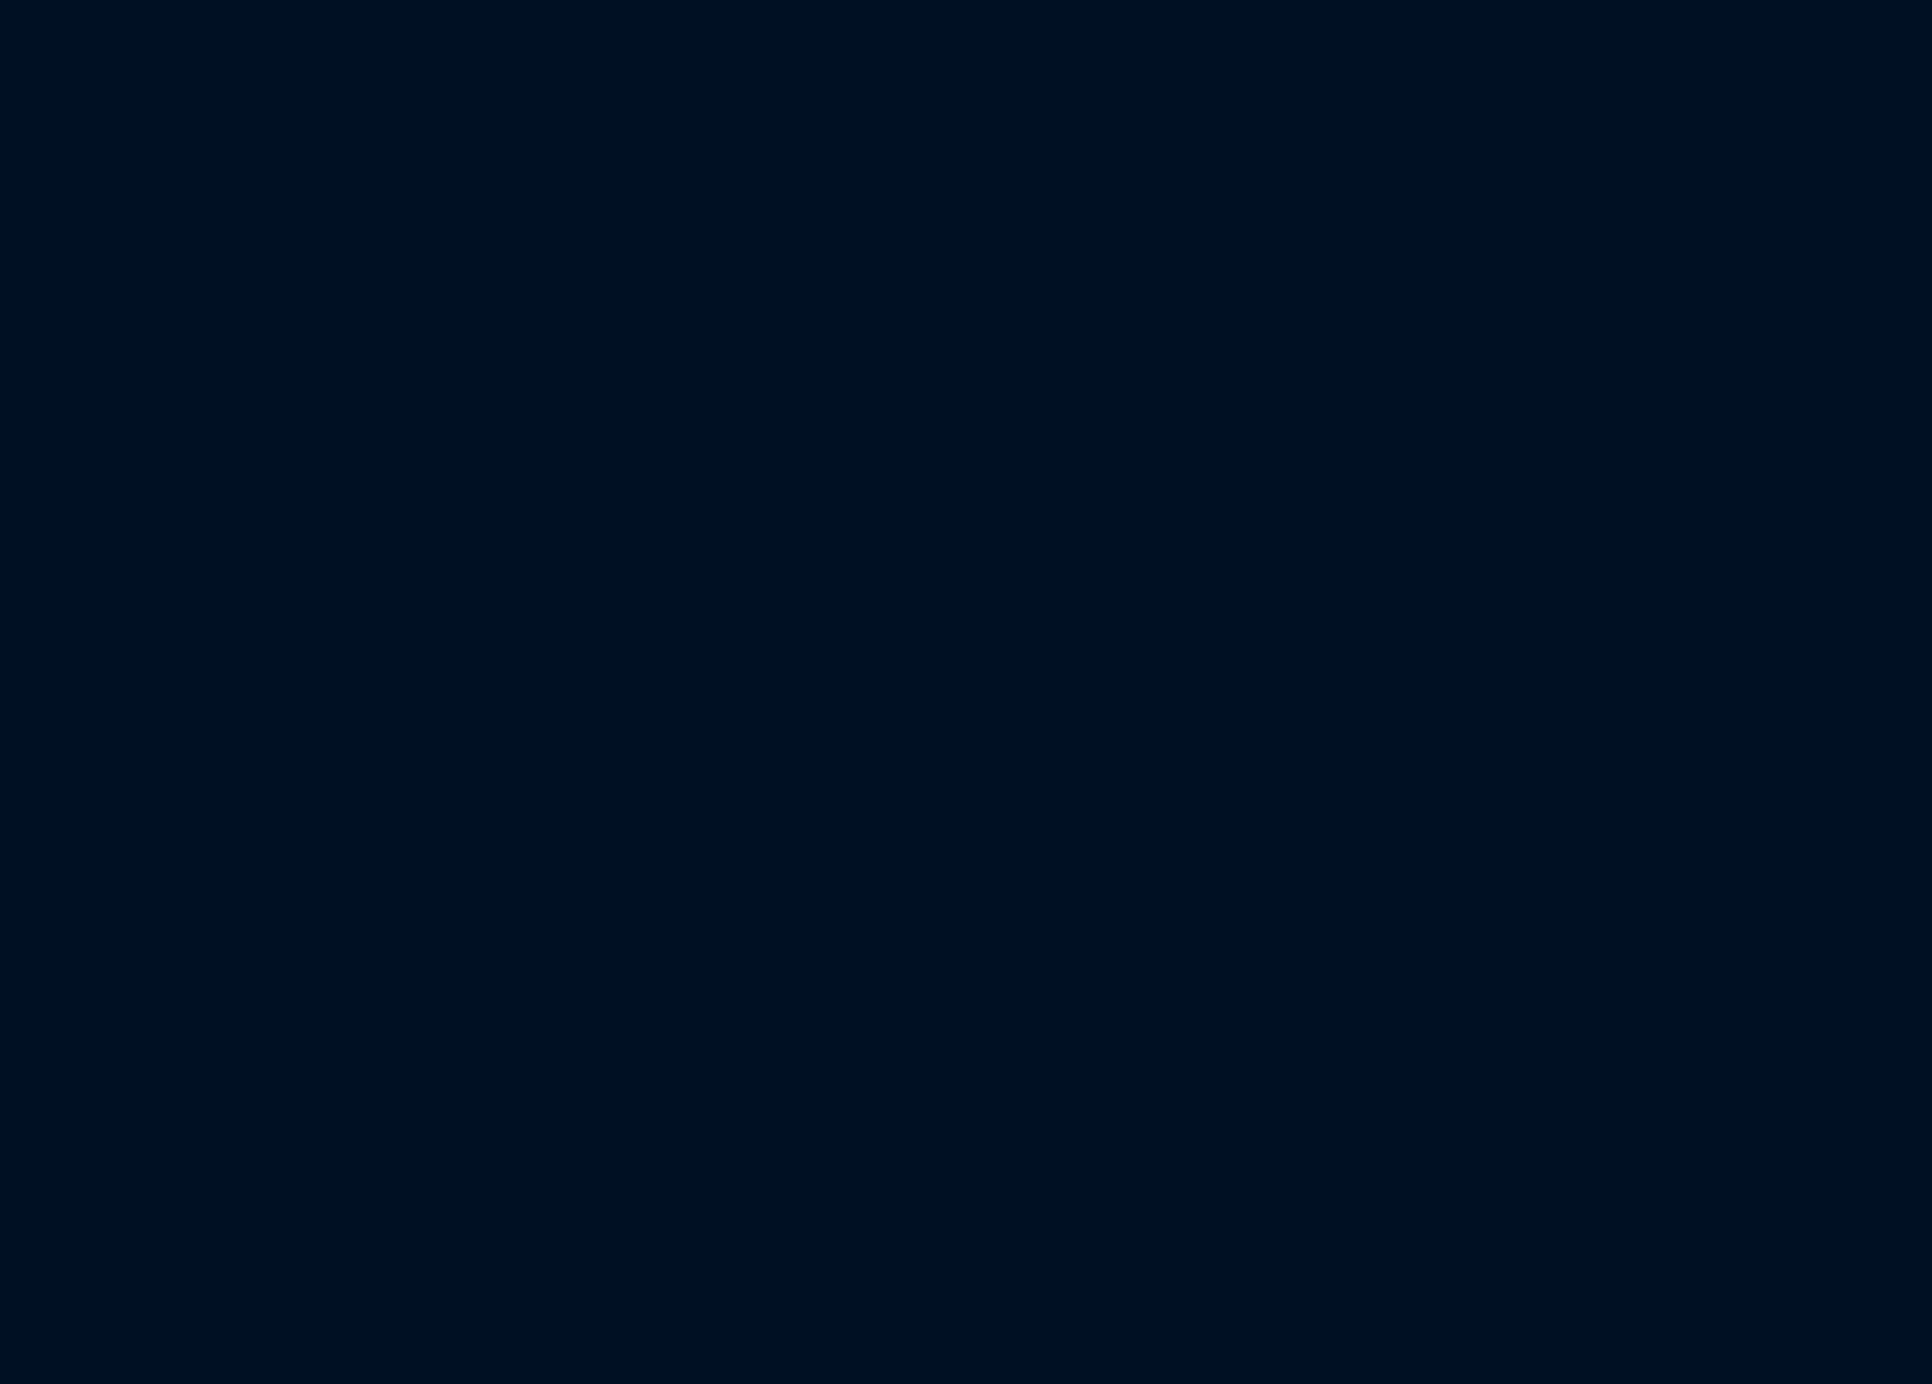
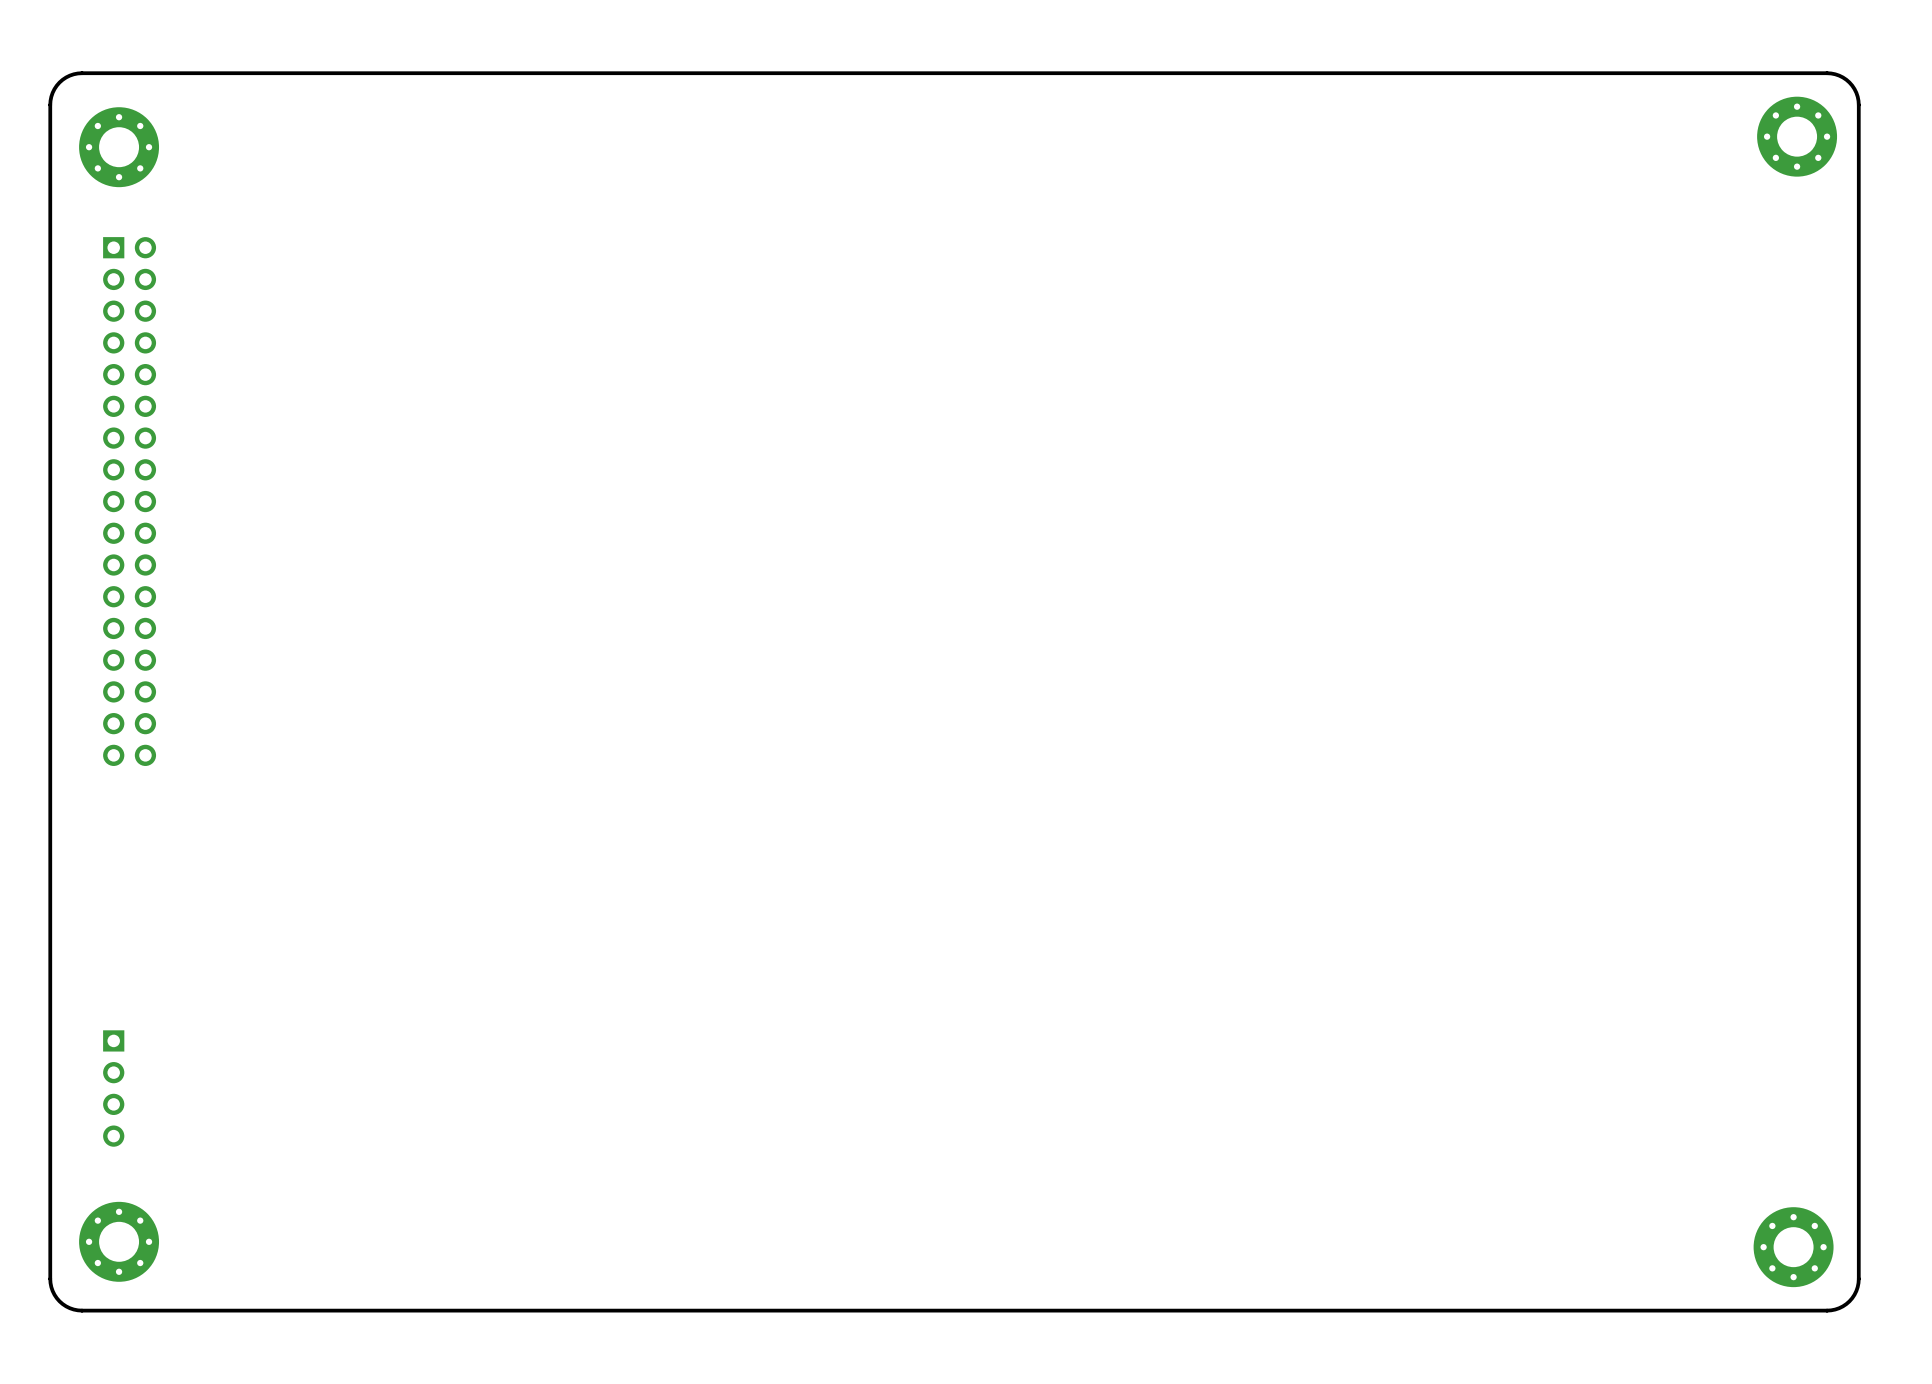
board edge: none -> (1827, 73) (81, 73) (73, 74) (62, 79) (54, 89) (50, 104) (50, 1278) (51, 1287) (56, 1298) (69, 1308) (81, 1310) (1827, 1310) (1839, 1308) (1846, 1304) (1854, 1294) (1858, 1278) (1858, 104) (1856, 92) (1849, 82) (1839, 75) (1827, 73)
part: none -> (1797, 136)
part: none -> (119, 147)
part: none -> (129, 501)
part: none -> (113, 1088)
part: none -> (119, 1241)
part: none -> (1793, 1247)

